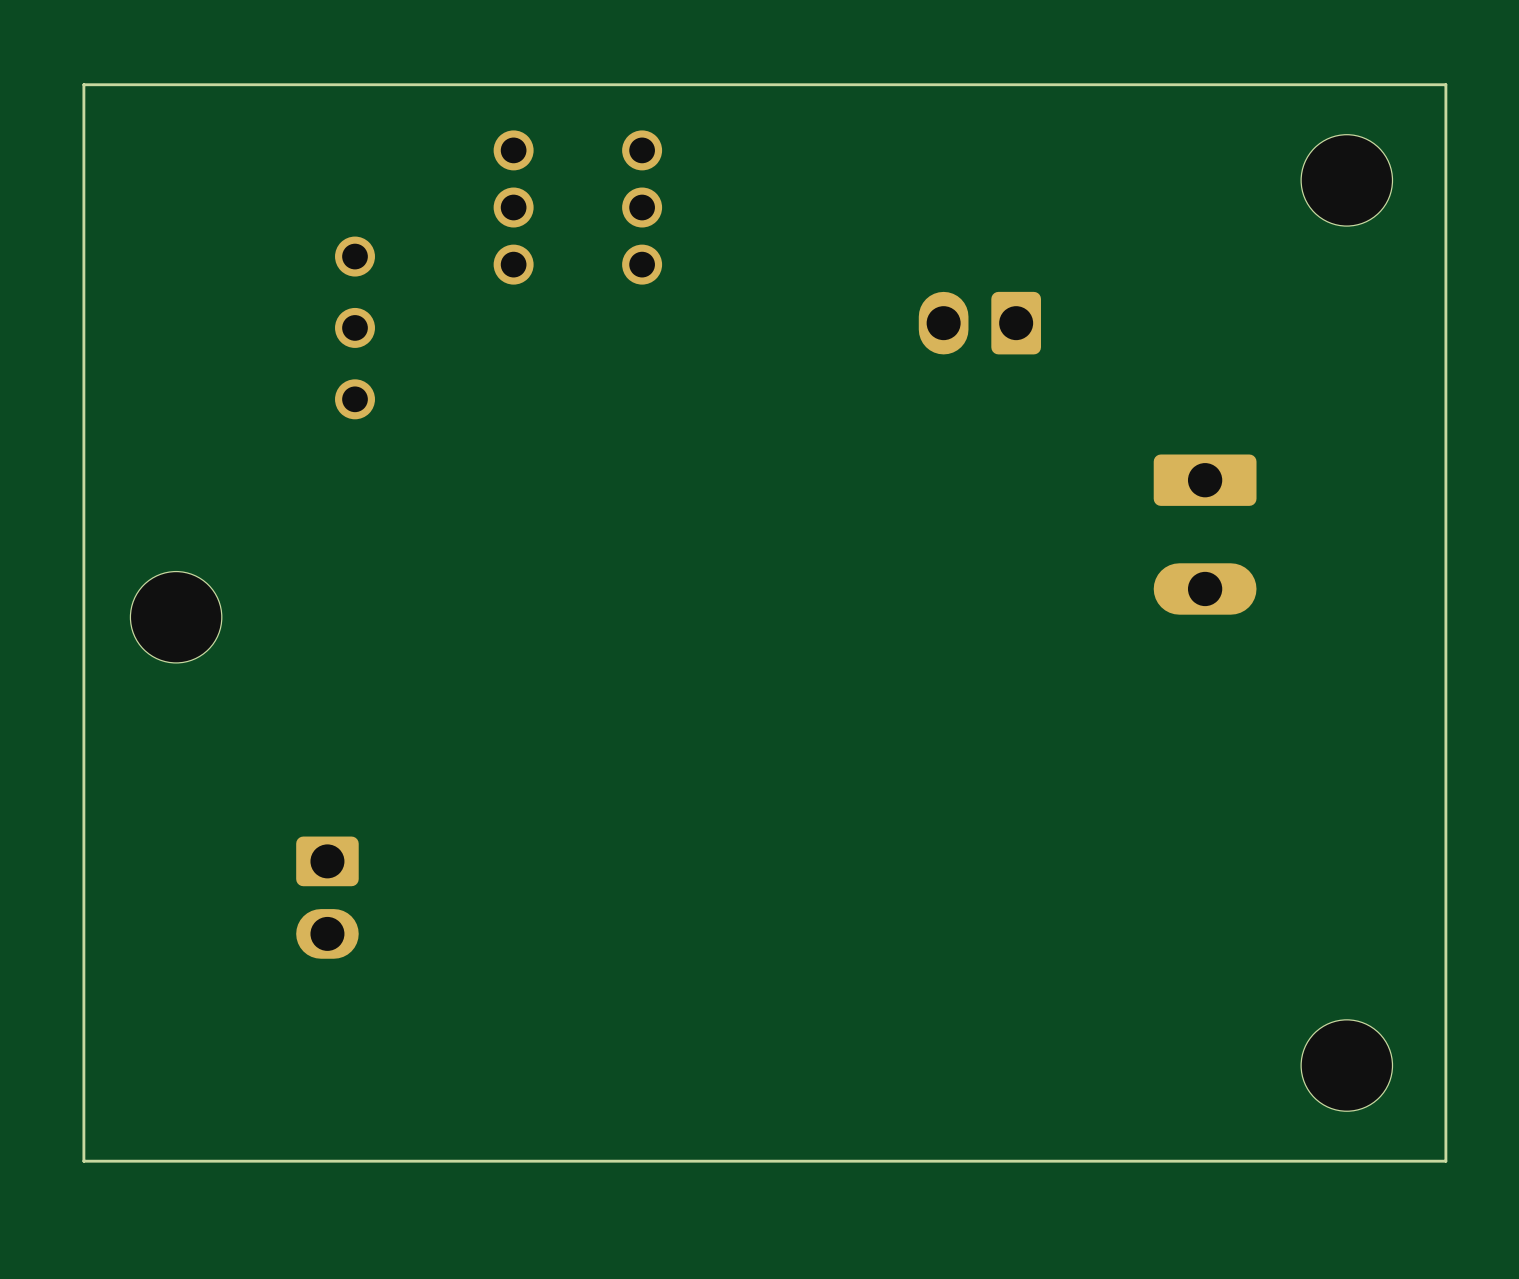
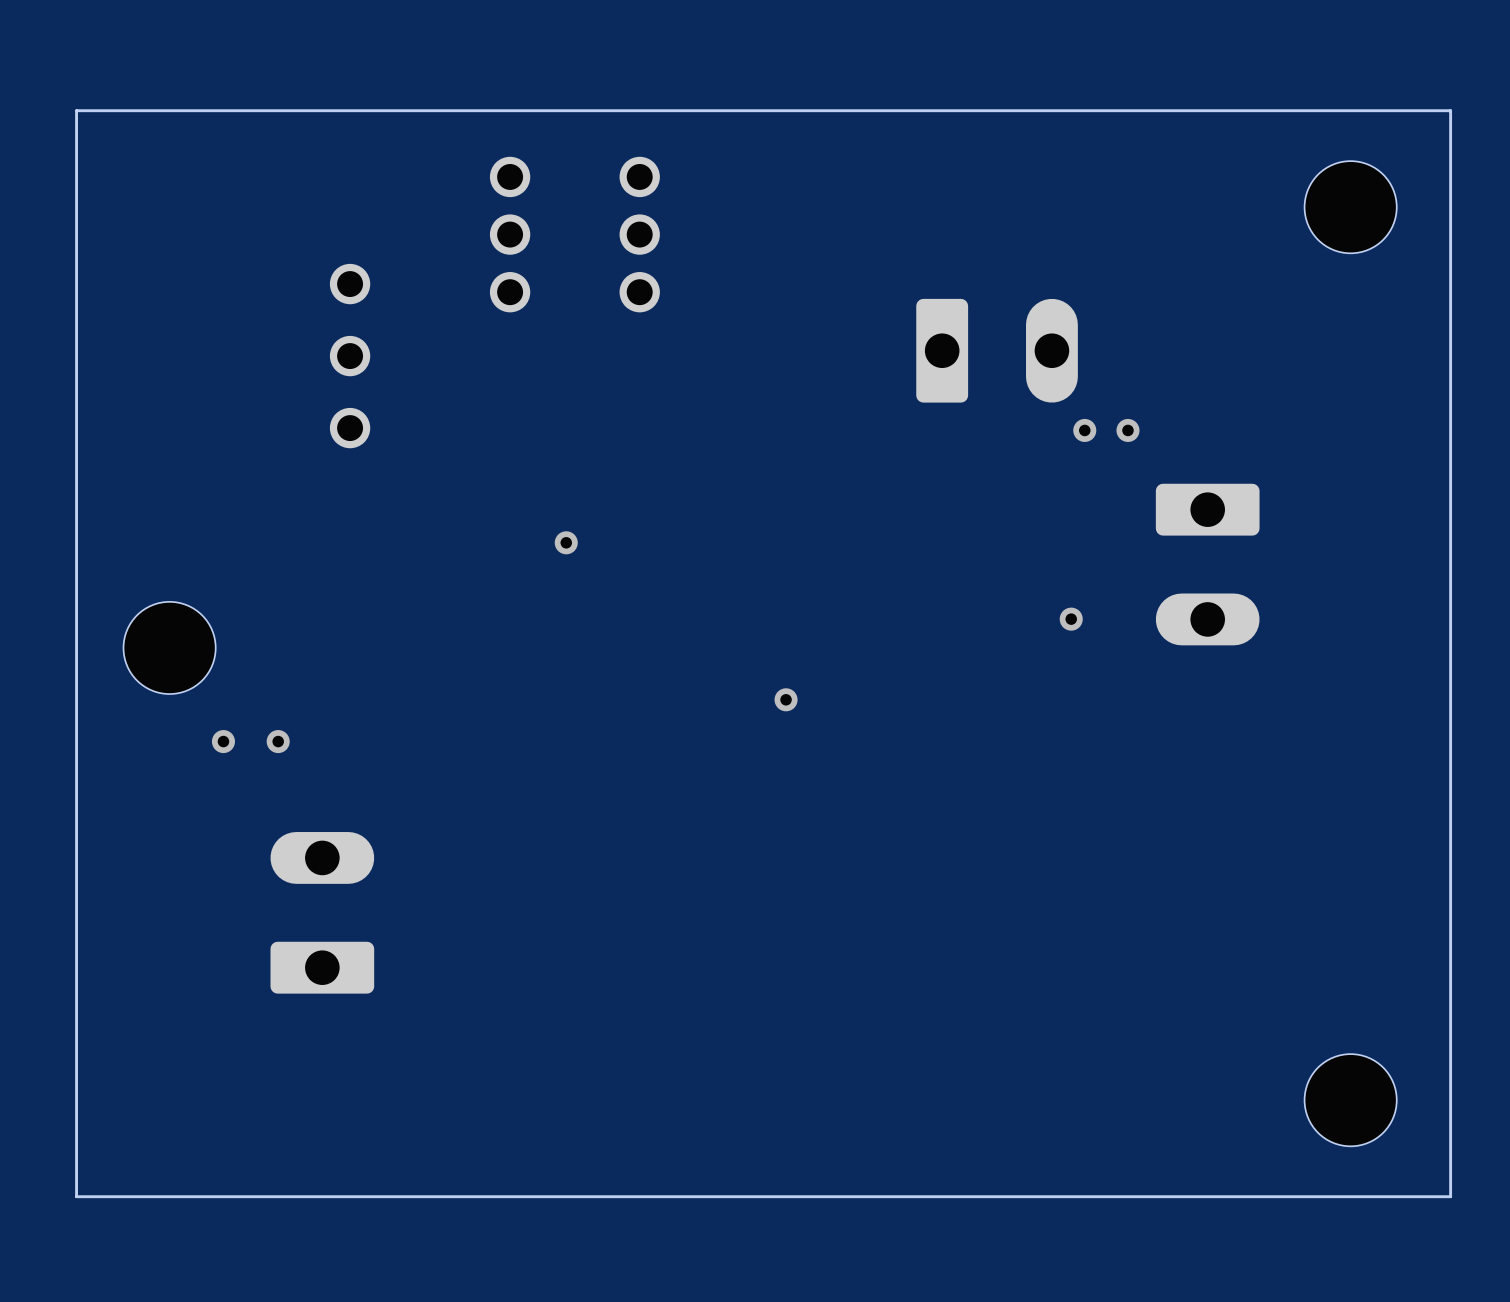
part footprint: [918, 291, 1042, 355] -> [916, 298, 1078, 403]
via: none -> (1084, 430)
via: none -> (1127, 430)
via: none -> (566, 542)
via: none -> (1071, 619)
via: none -> (786, 699)
via: none -> (223, 741)
via: none -> (278, 741)
part footprint: [296, 836, 359, 959] -> [270, 832, 375, 994]

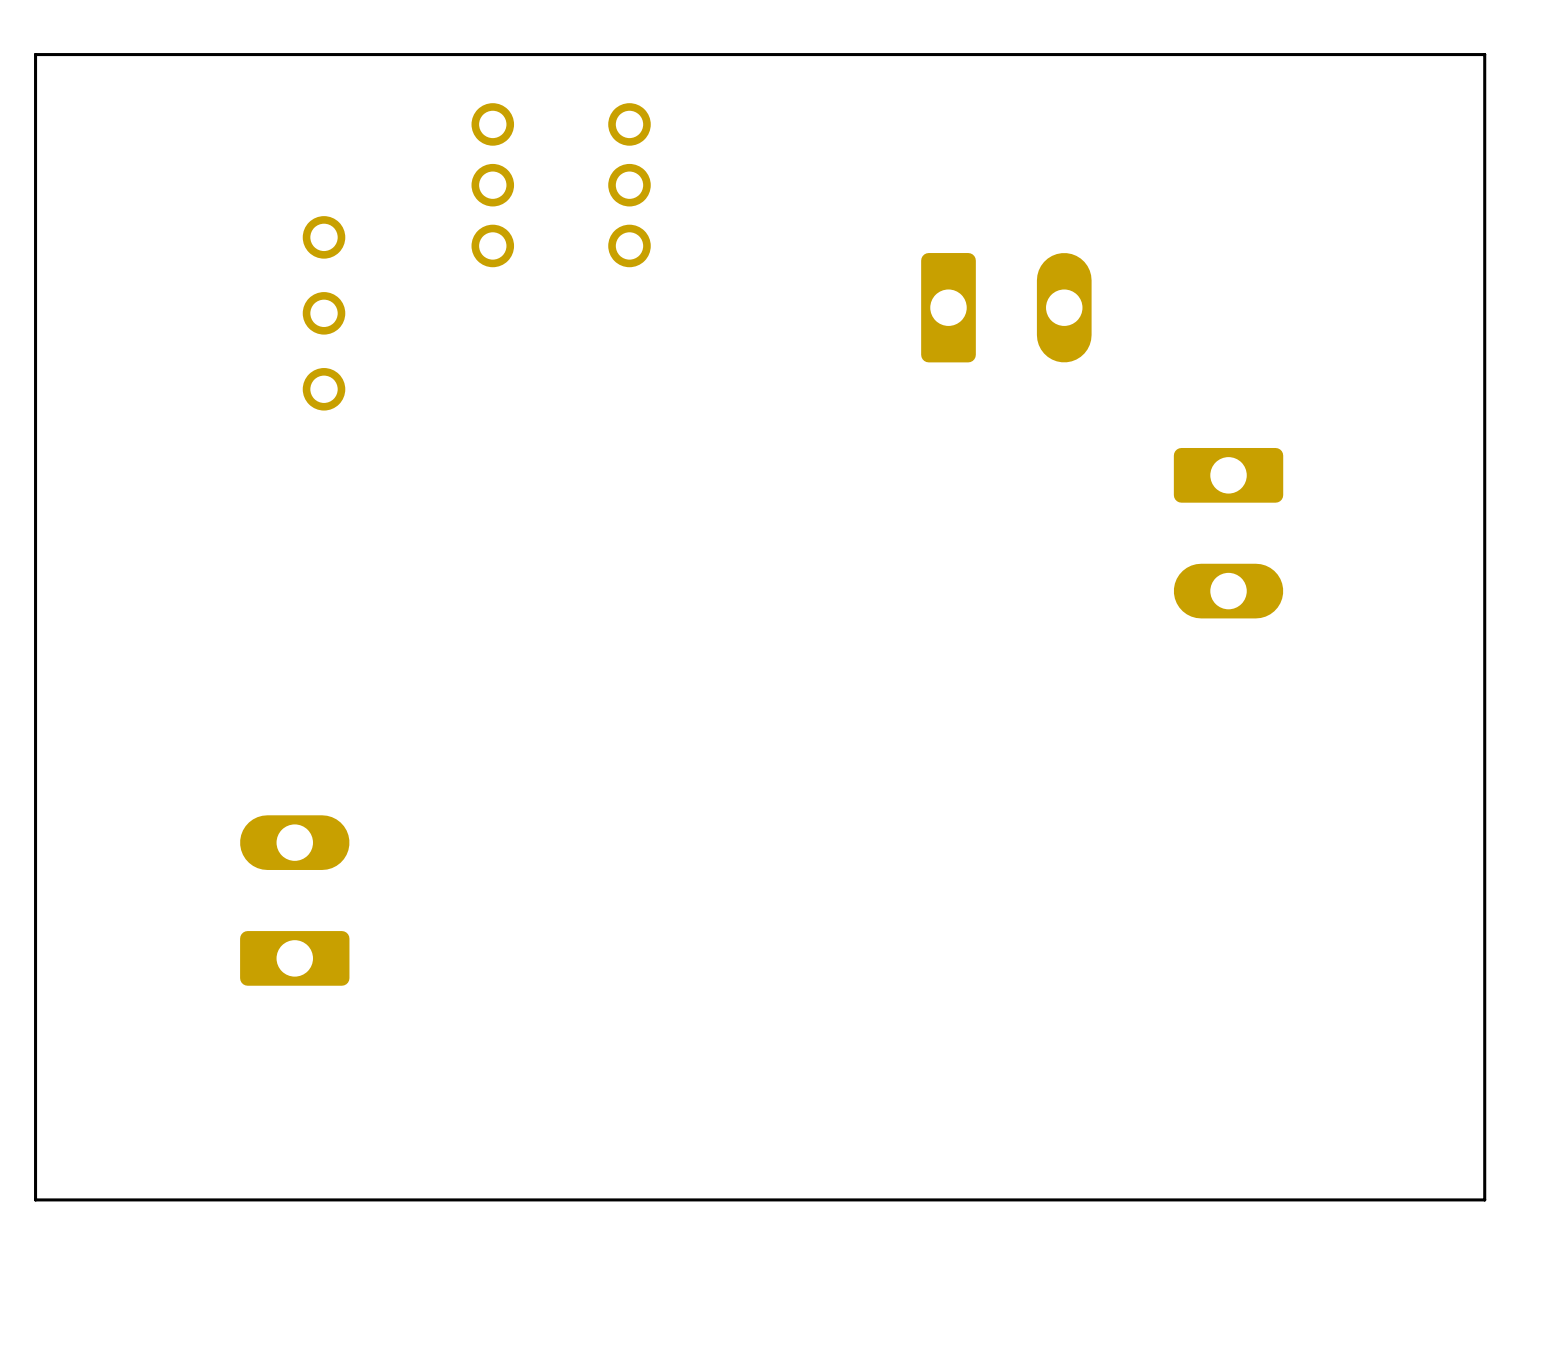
part: (1350, 207) -> none
via: (1084, 430) -> none
via: (1127, 430) -> none
via: (566, 542) -> none
via: (1071, 619) -> none
part: (169, 647) -> none
via: (786, 699) -> none
via: (223, 741) -> none
via: (278, 741) -> none
part: (1350, 1100) -> none

